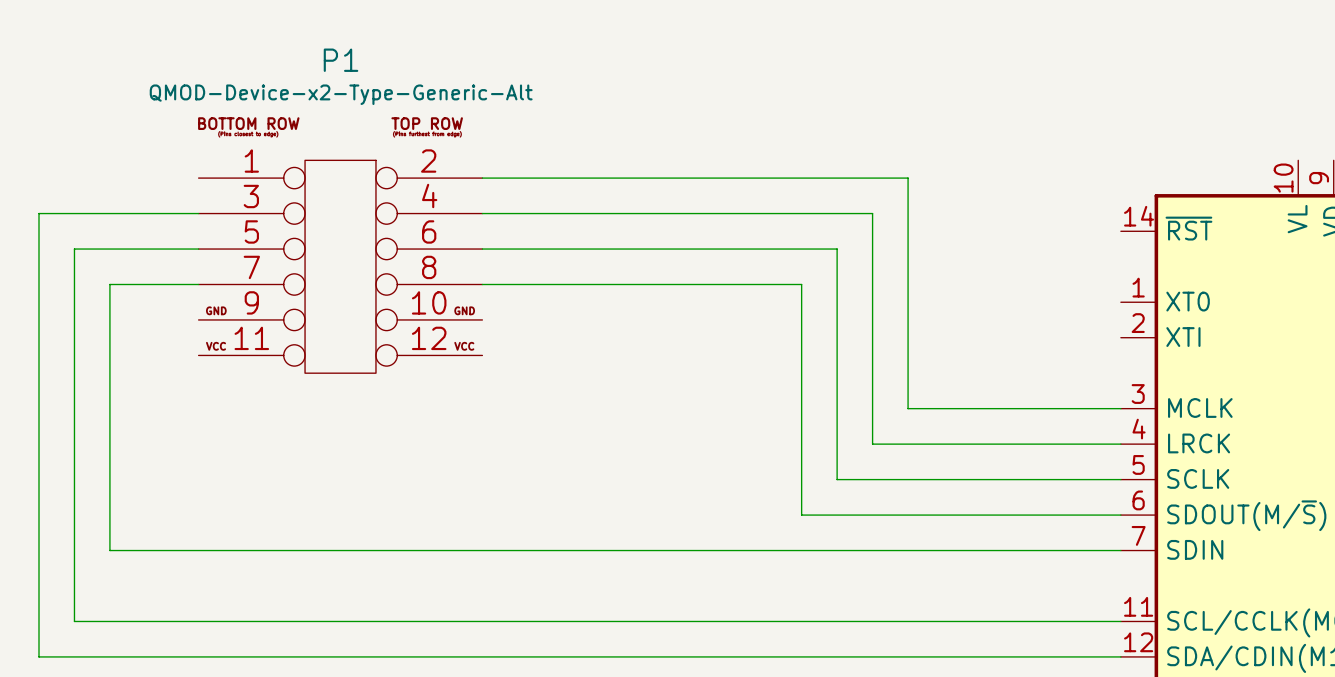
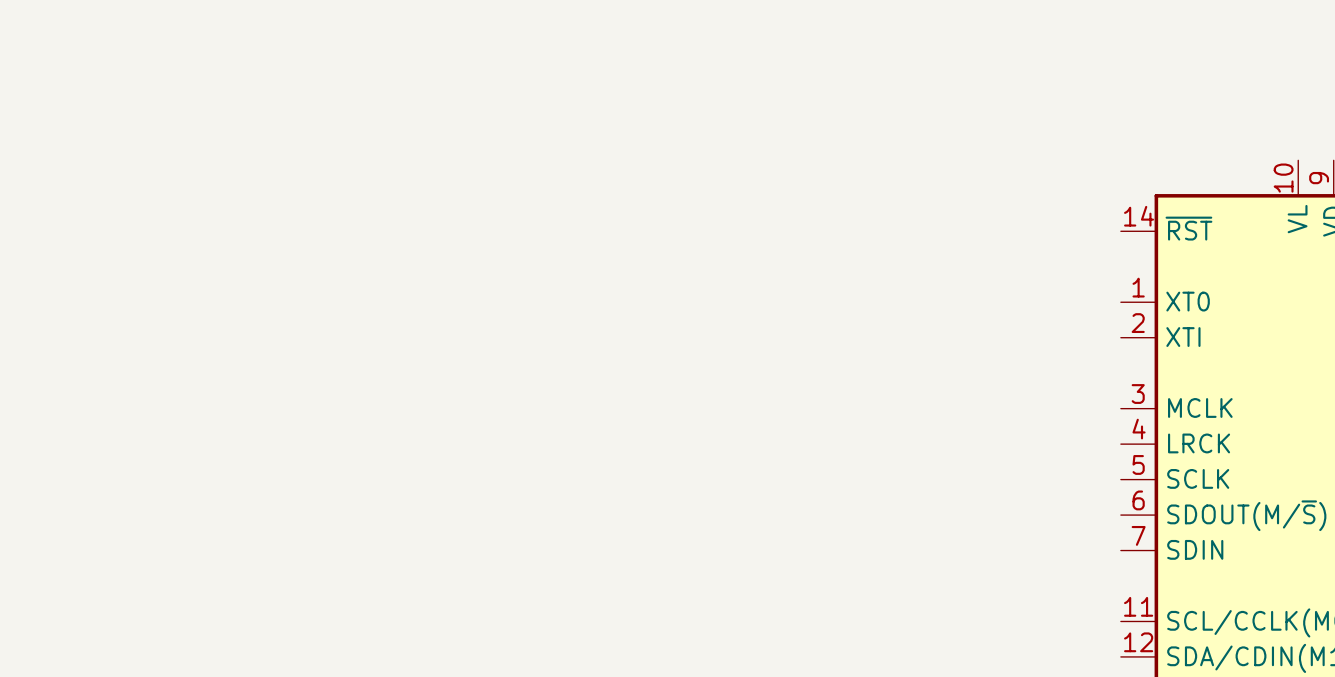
wire: (482, 178) (908, 178) (908, 408) (1120, 408) -> none
wire: (198, 213) (38, 213) (38, 656) (1120, 656) -> none
wire: (482, 213) (872, 213) (872, 444) (1120, 444) -> none
wire: (198, 249) (74, 249) (74, 621) (1120, 621) -> none
wire: (482, 249) (837, 249) (837, 479) (1120, 479) -> none
P1: QMOD-Device-x2-Type-Generic-Alt (340, 266) -> none
wire: (198, 284) (109, 284) (109, 550) (1120, 550) -> none
wire: (482, 284) (801, 284) (801, 515) (1120, 515) -> none

